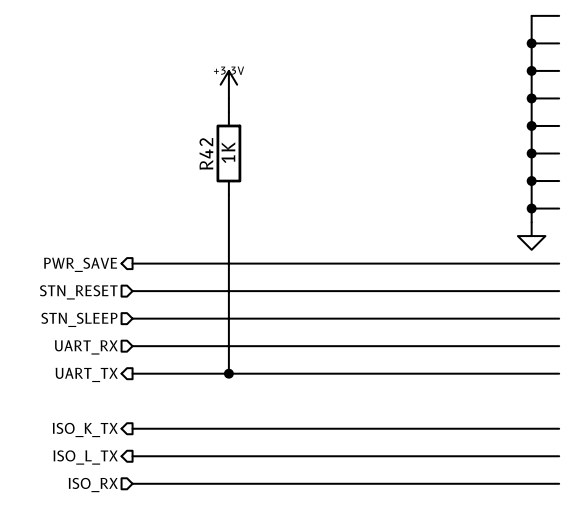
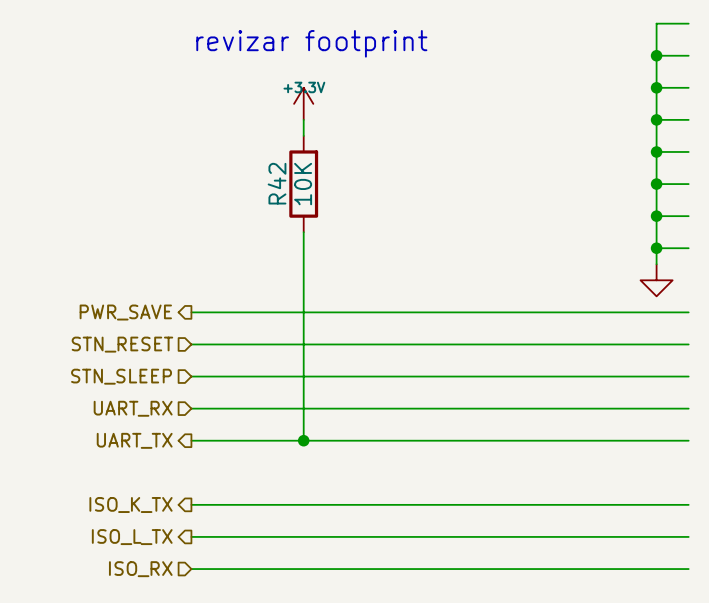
text: none -> revizar footprint (311, 43)
R42 value: 1K (228, 152) -> 10K (303, 184)

